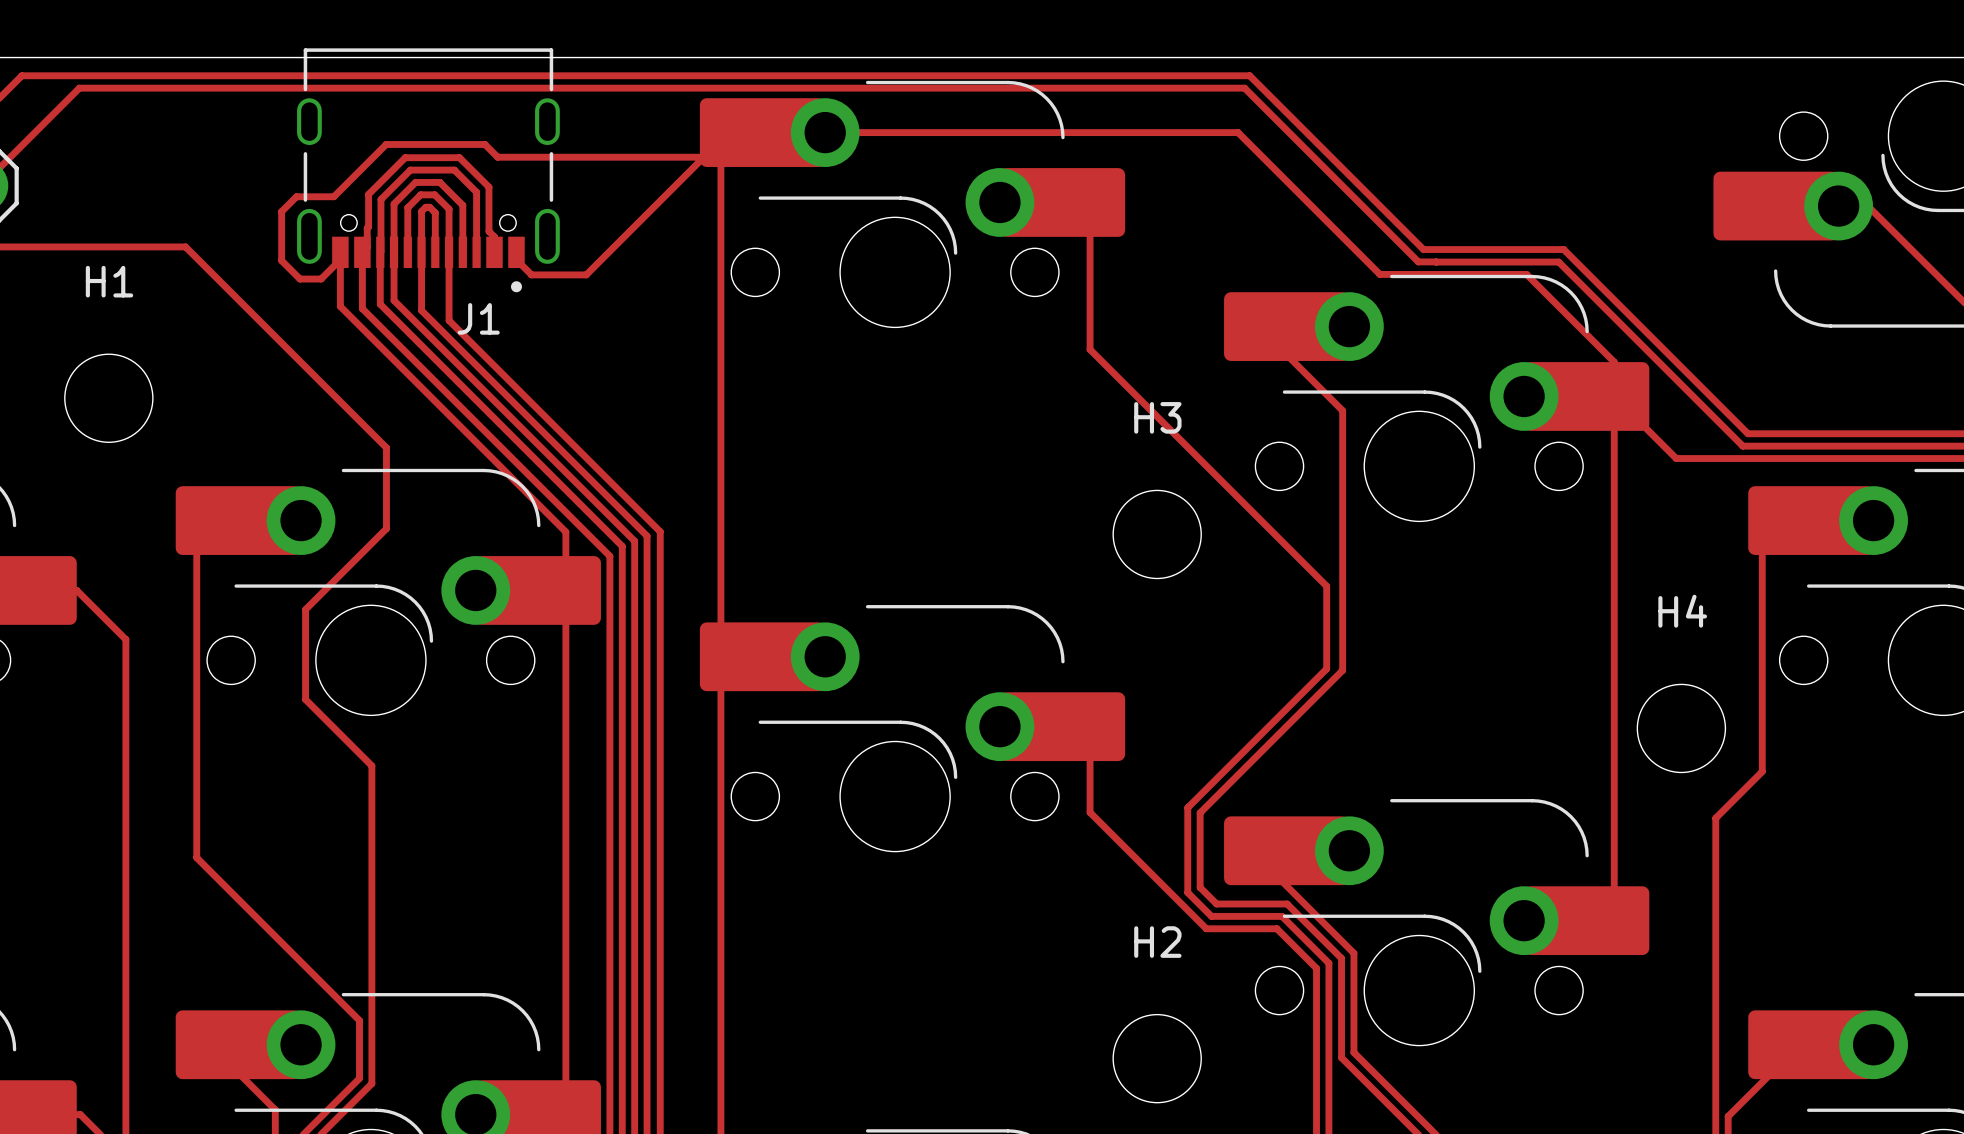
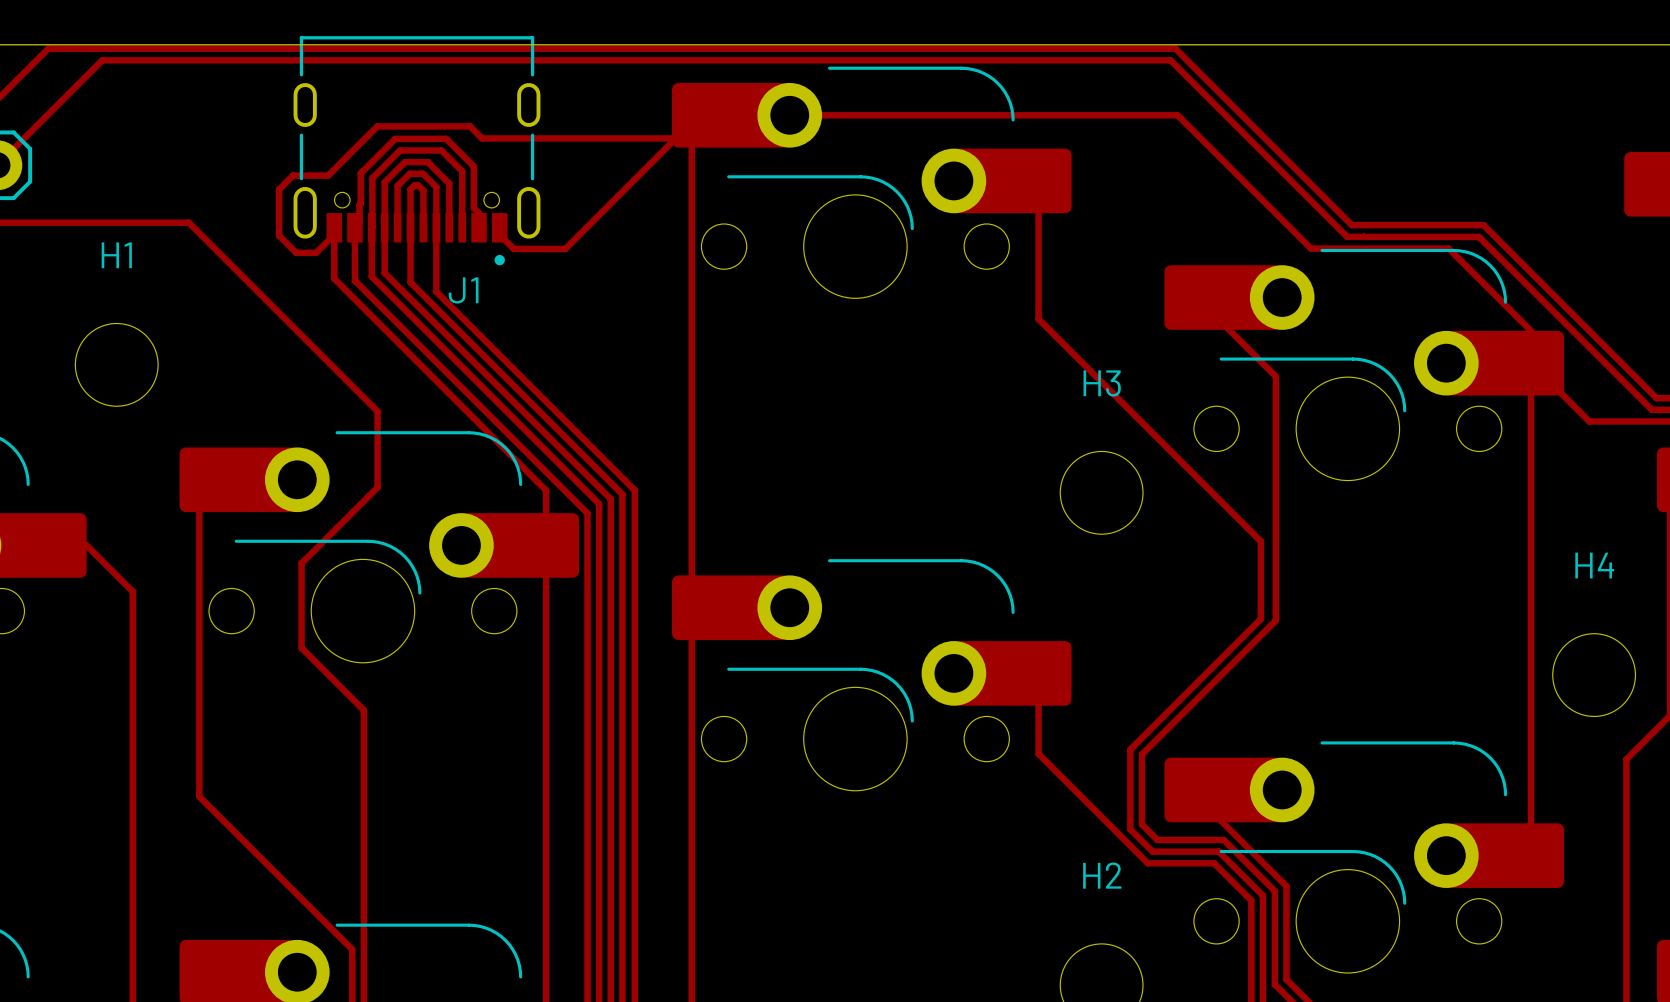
top track: (21, 75) (1249, 75) -> (35, 61) (48, 48) (1175, 48) (1188, 61)
top track: (79, 88) (1244, 88) -> (89, 73) (102, 60) (1170, 60) (1183, 73)

